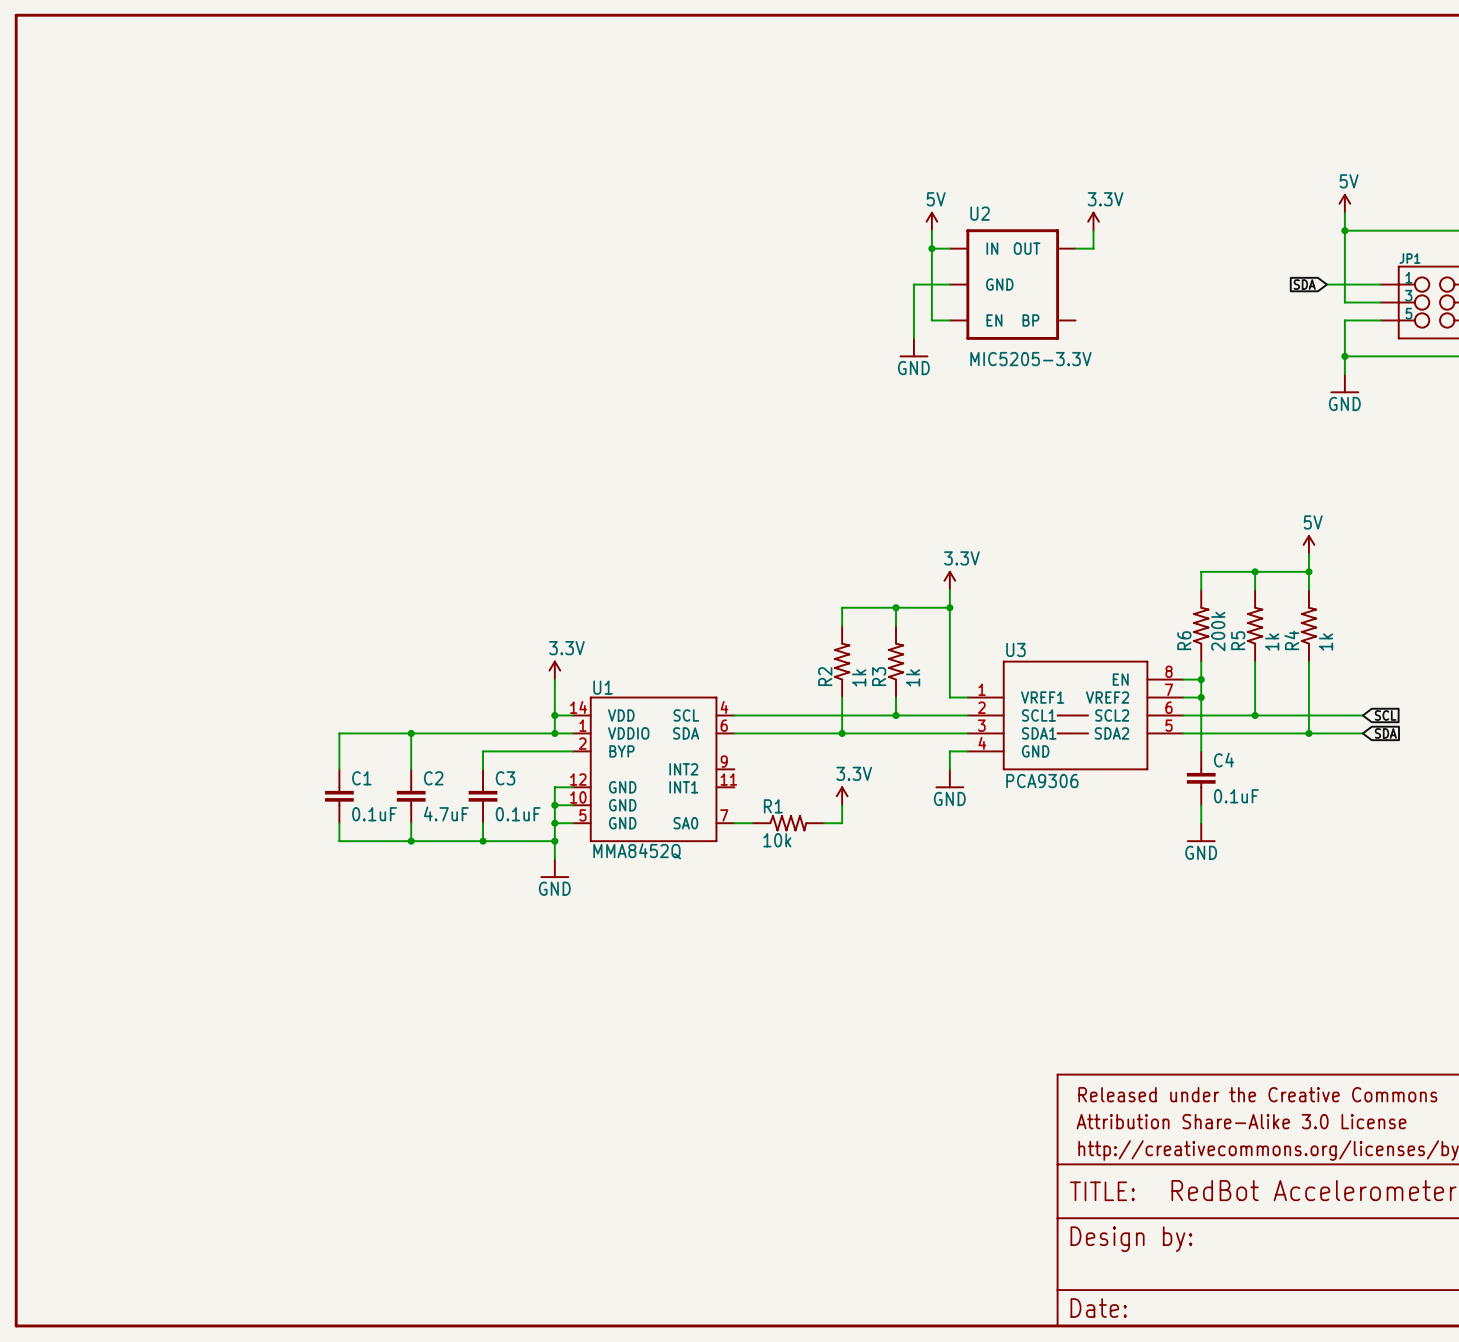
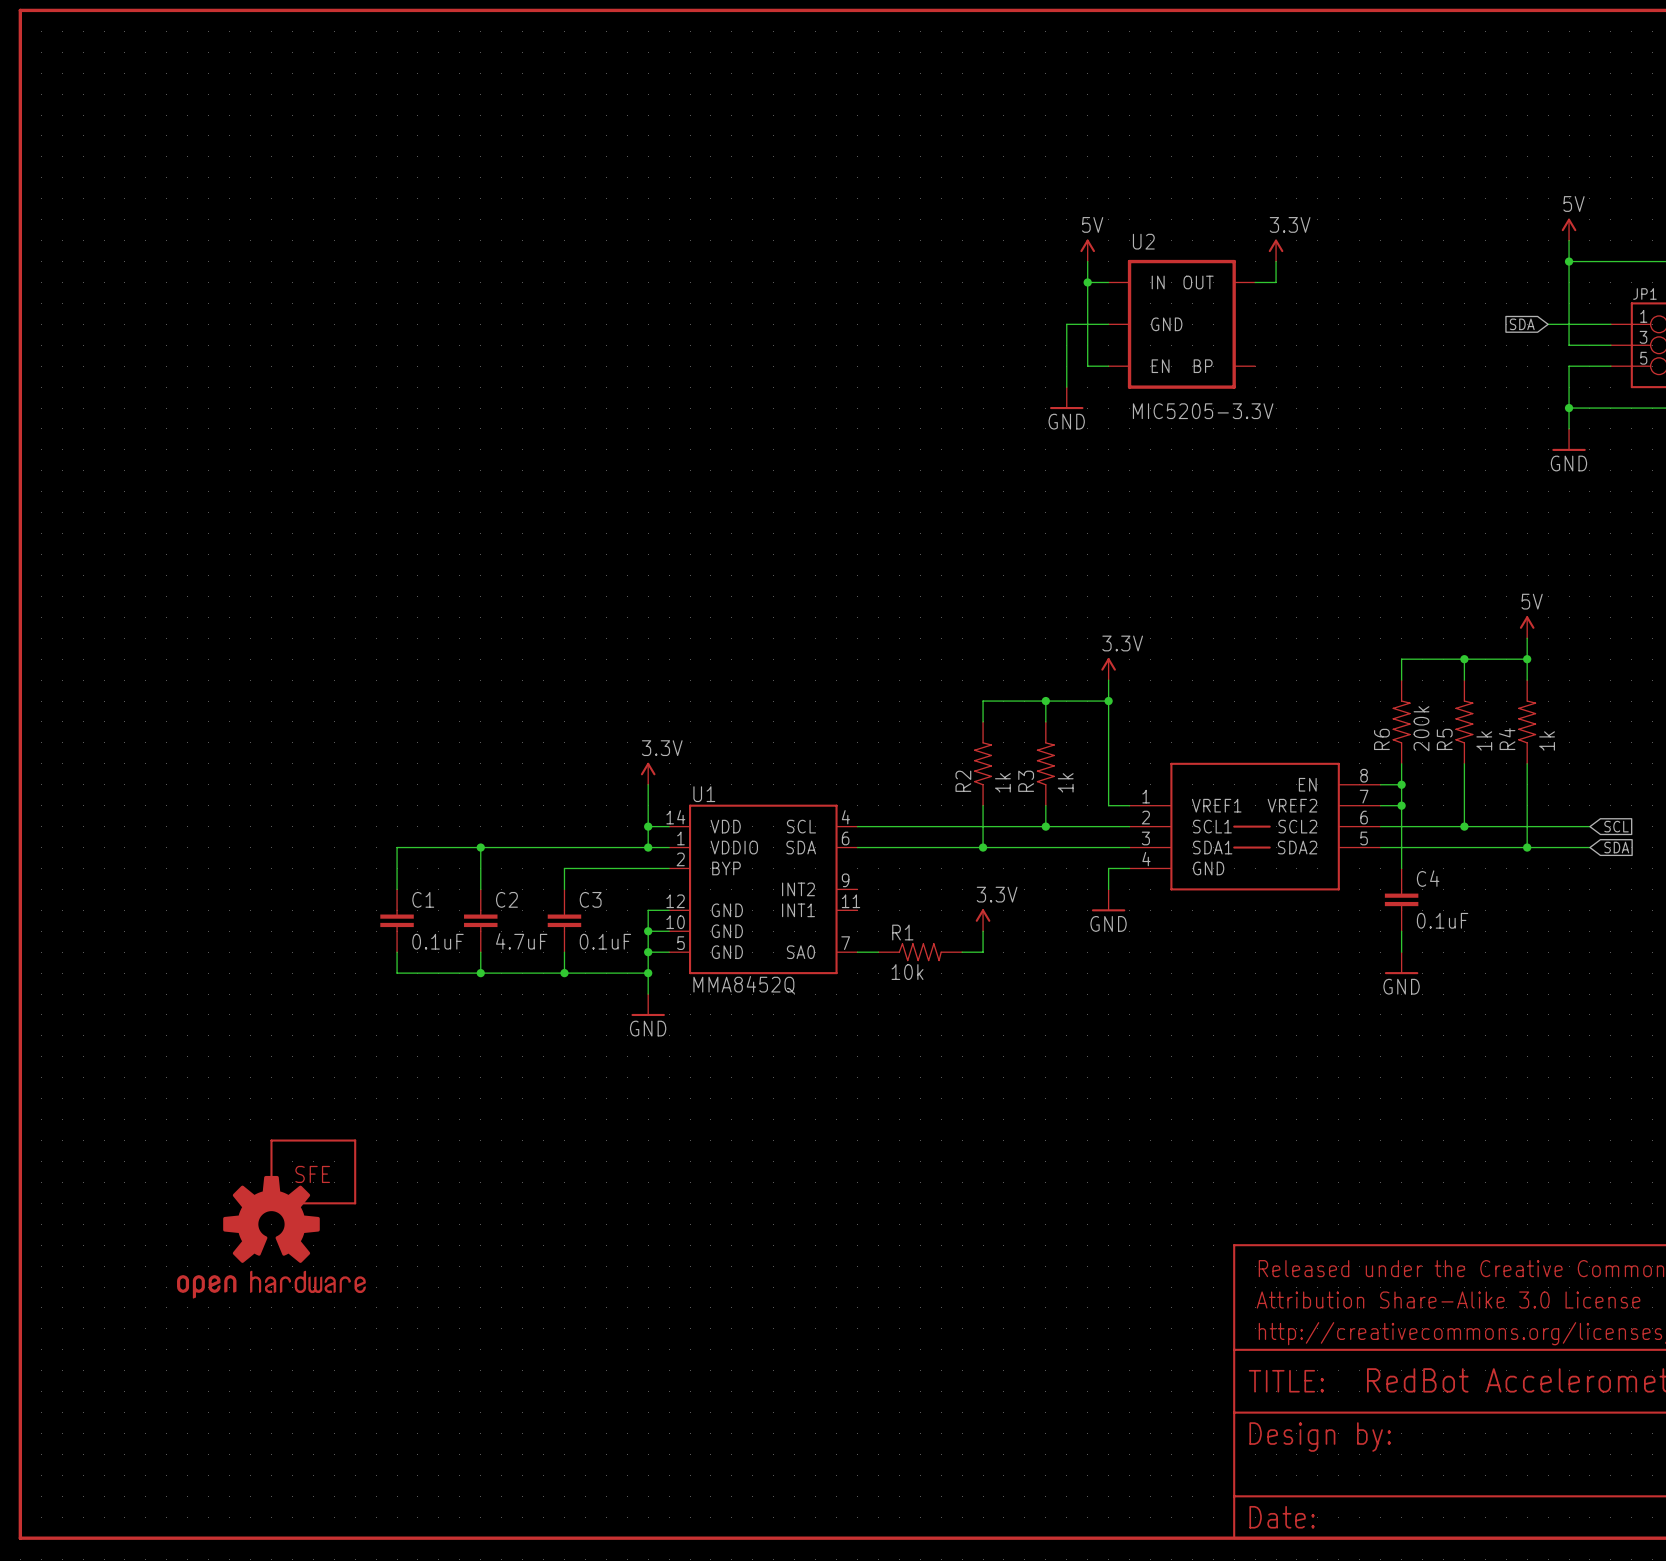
U3 name: U3 (1015, 649) -> none
U3 value: PCA9306 (1042, 781) -> none
part: none -> (313, 1171)
part: none -> (271, 1237)

